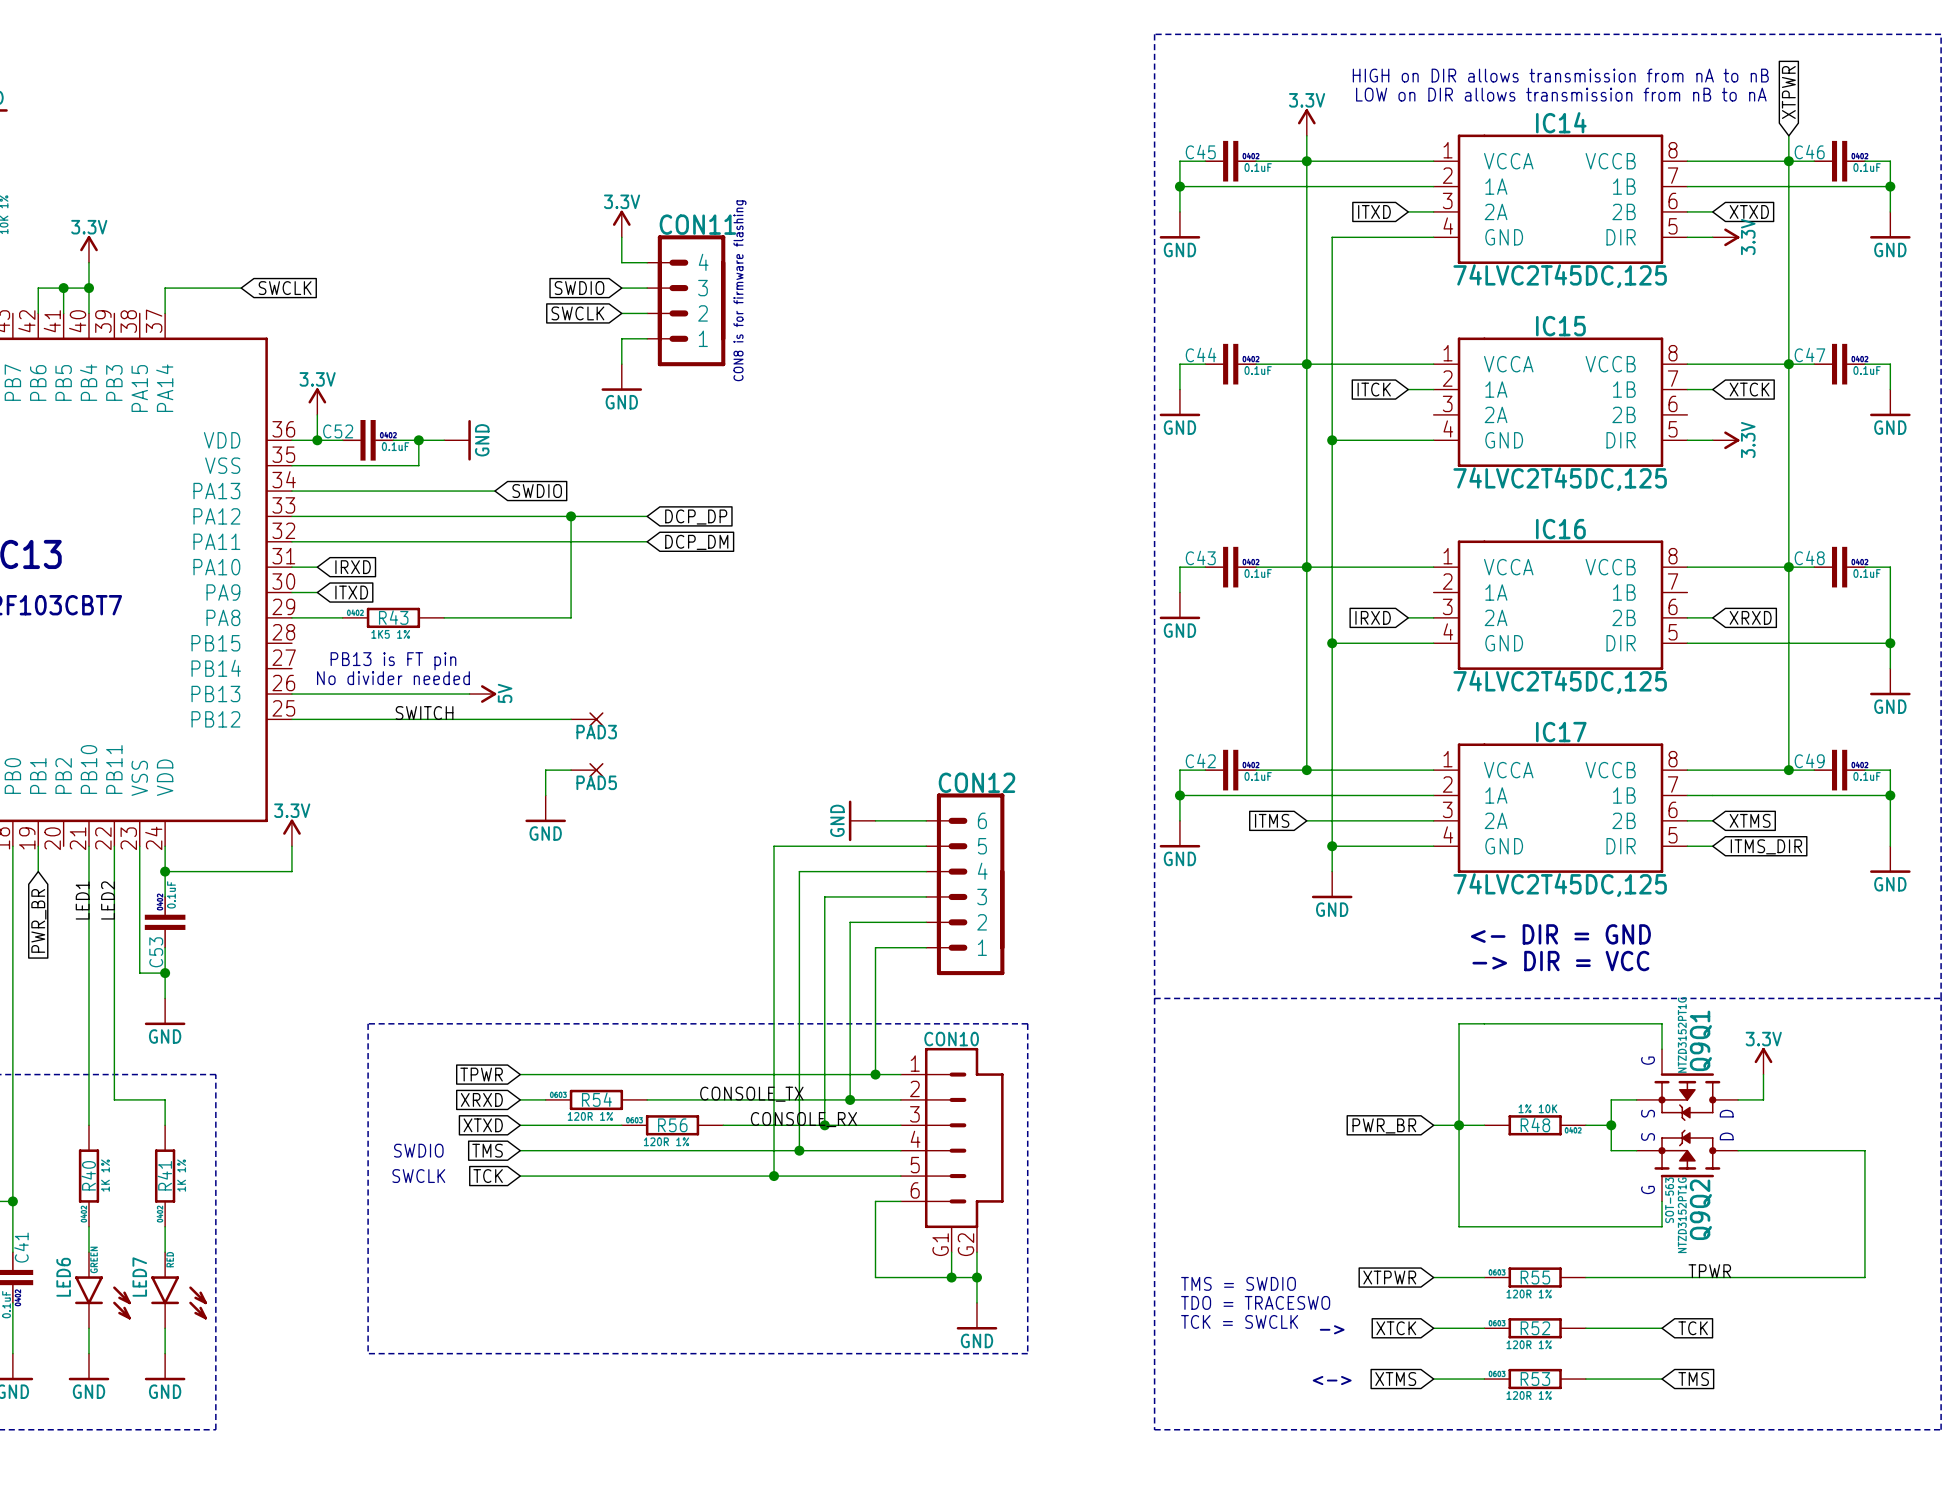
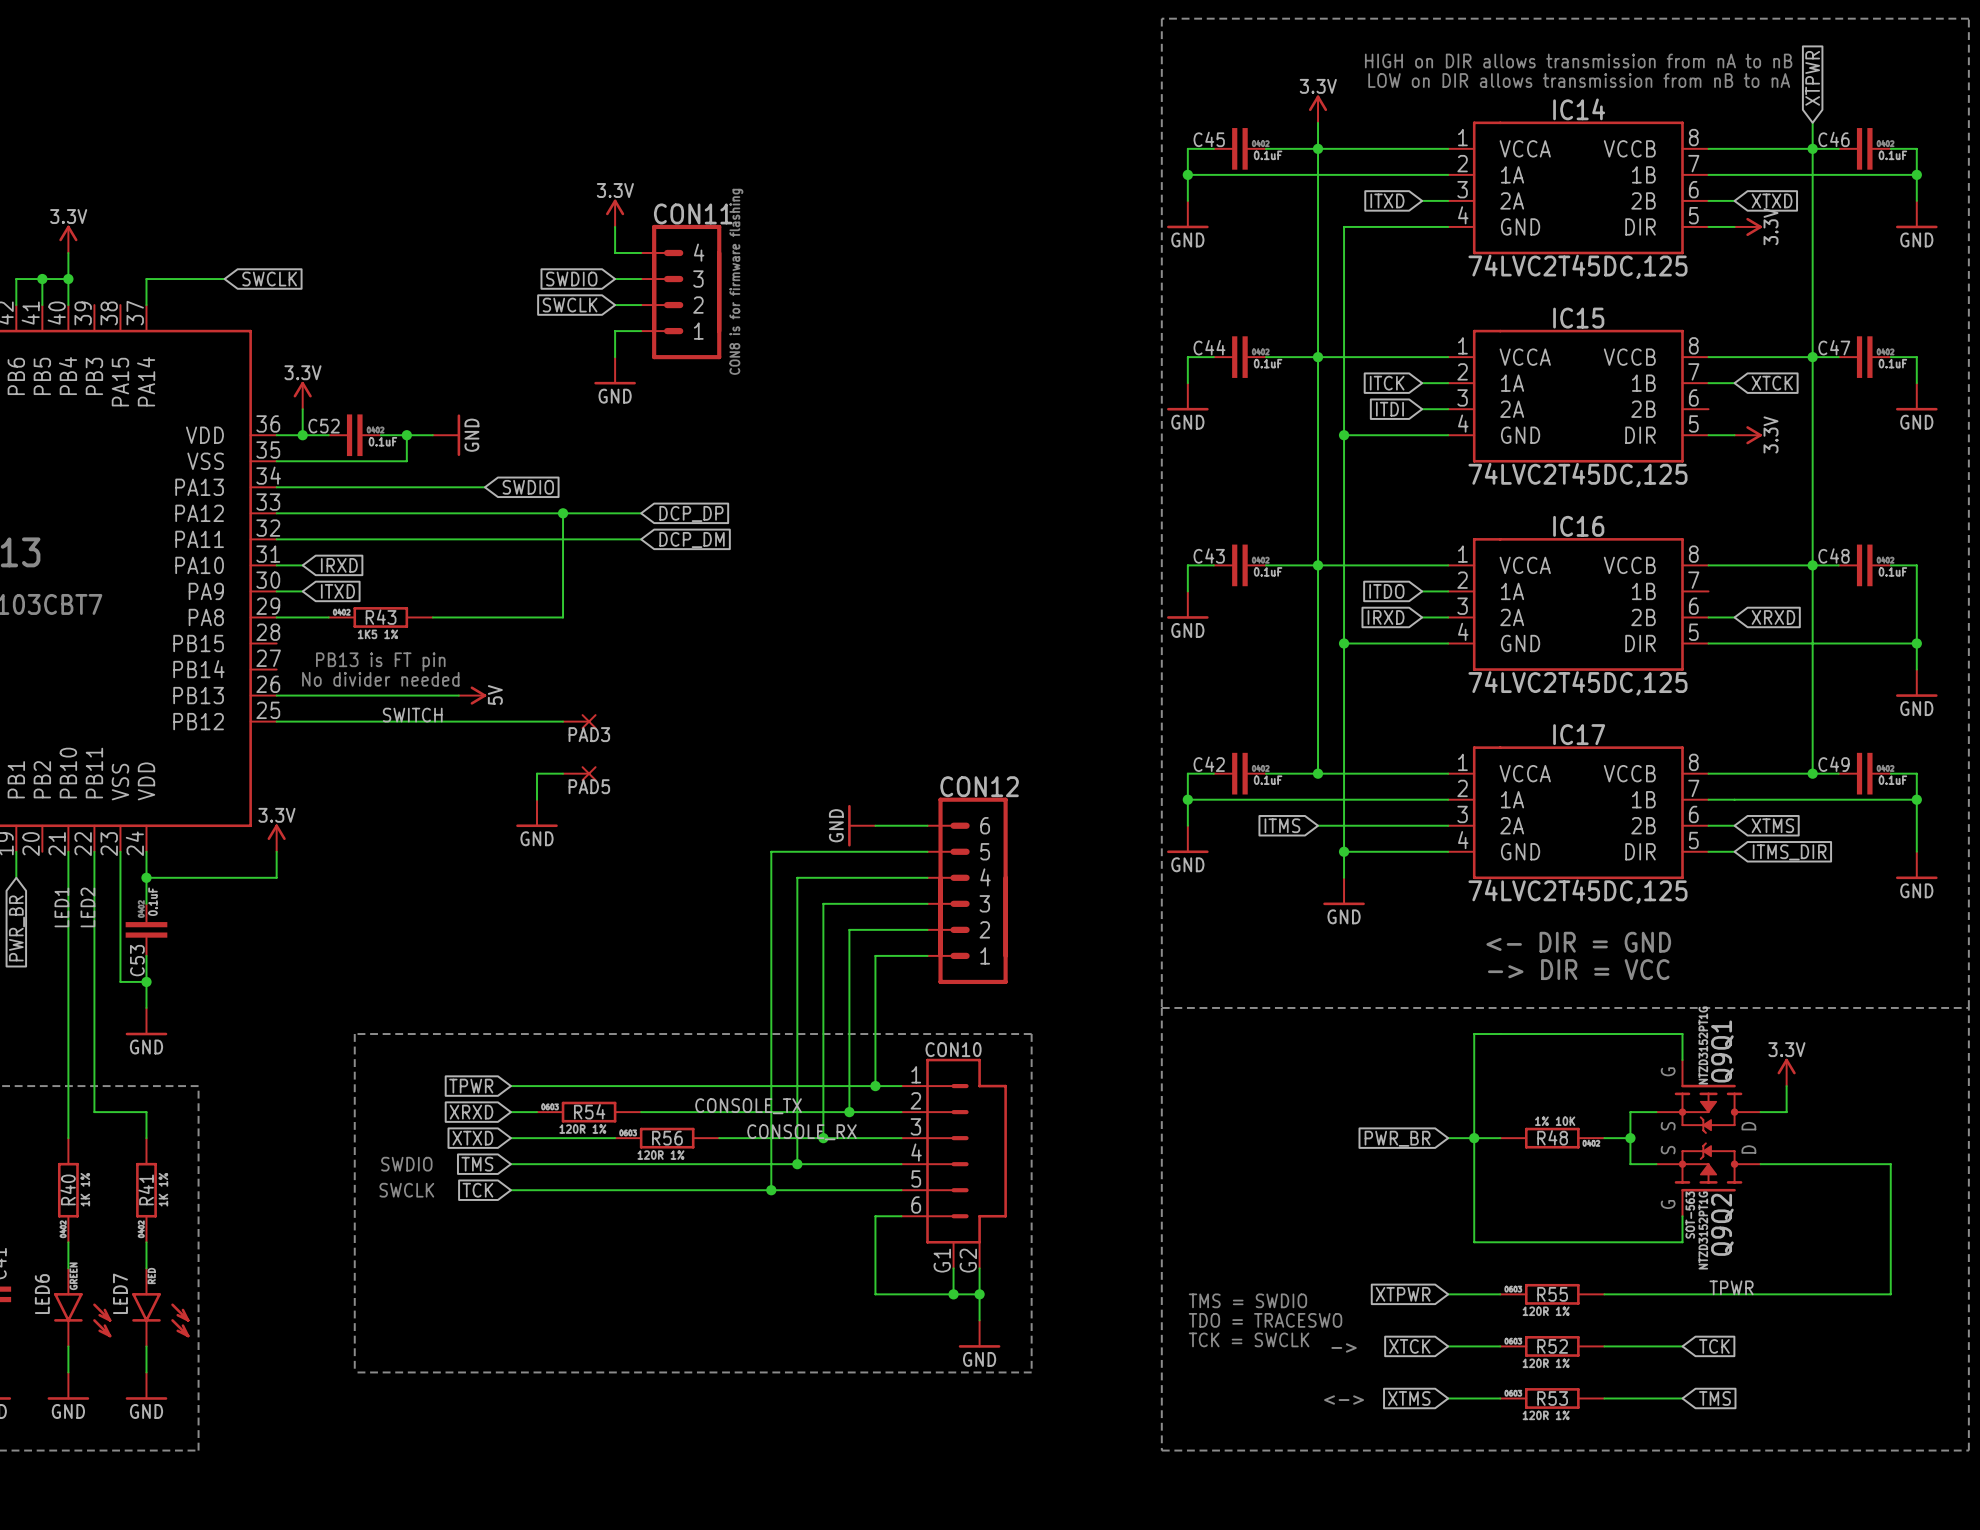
global label: none -> ITDI (1389, 409)
wire: none -> (1422, 409) (1448, 409)
global label: none -> ITDO (1386, 591)
wire: none -> (1422, 591) (1448, 591)

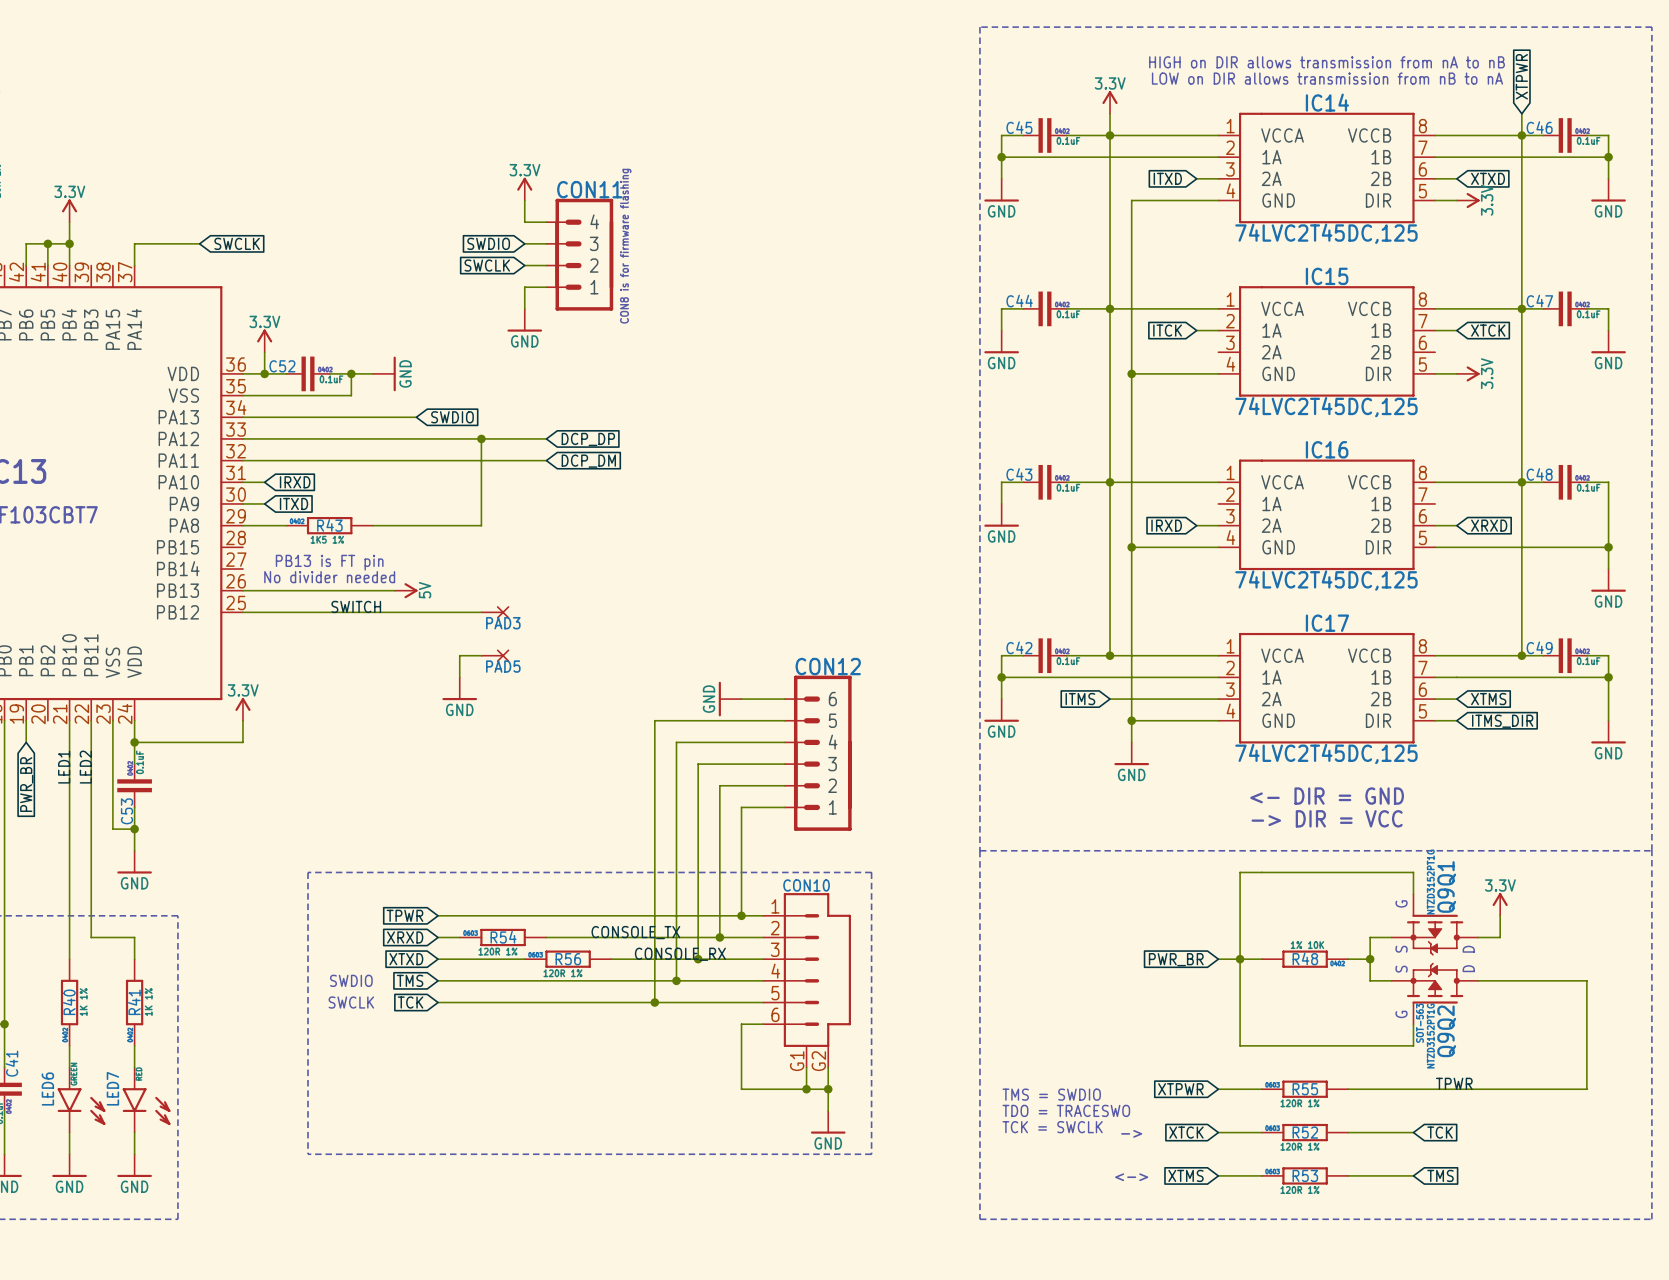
global label: ITDI (1389, 409) -> none
wire: (1422, 409) (1448, 409) -> none
global label: ITDO (1386, 591) -> none
wire: (1422, 591) (1448, 591) -> none

